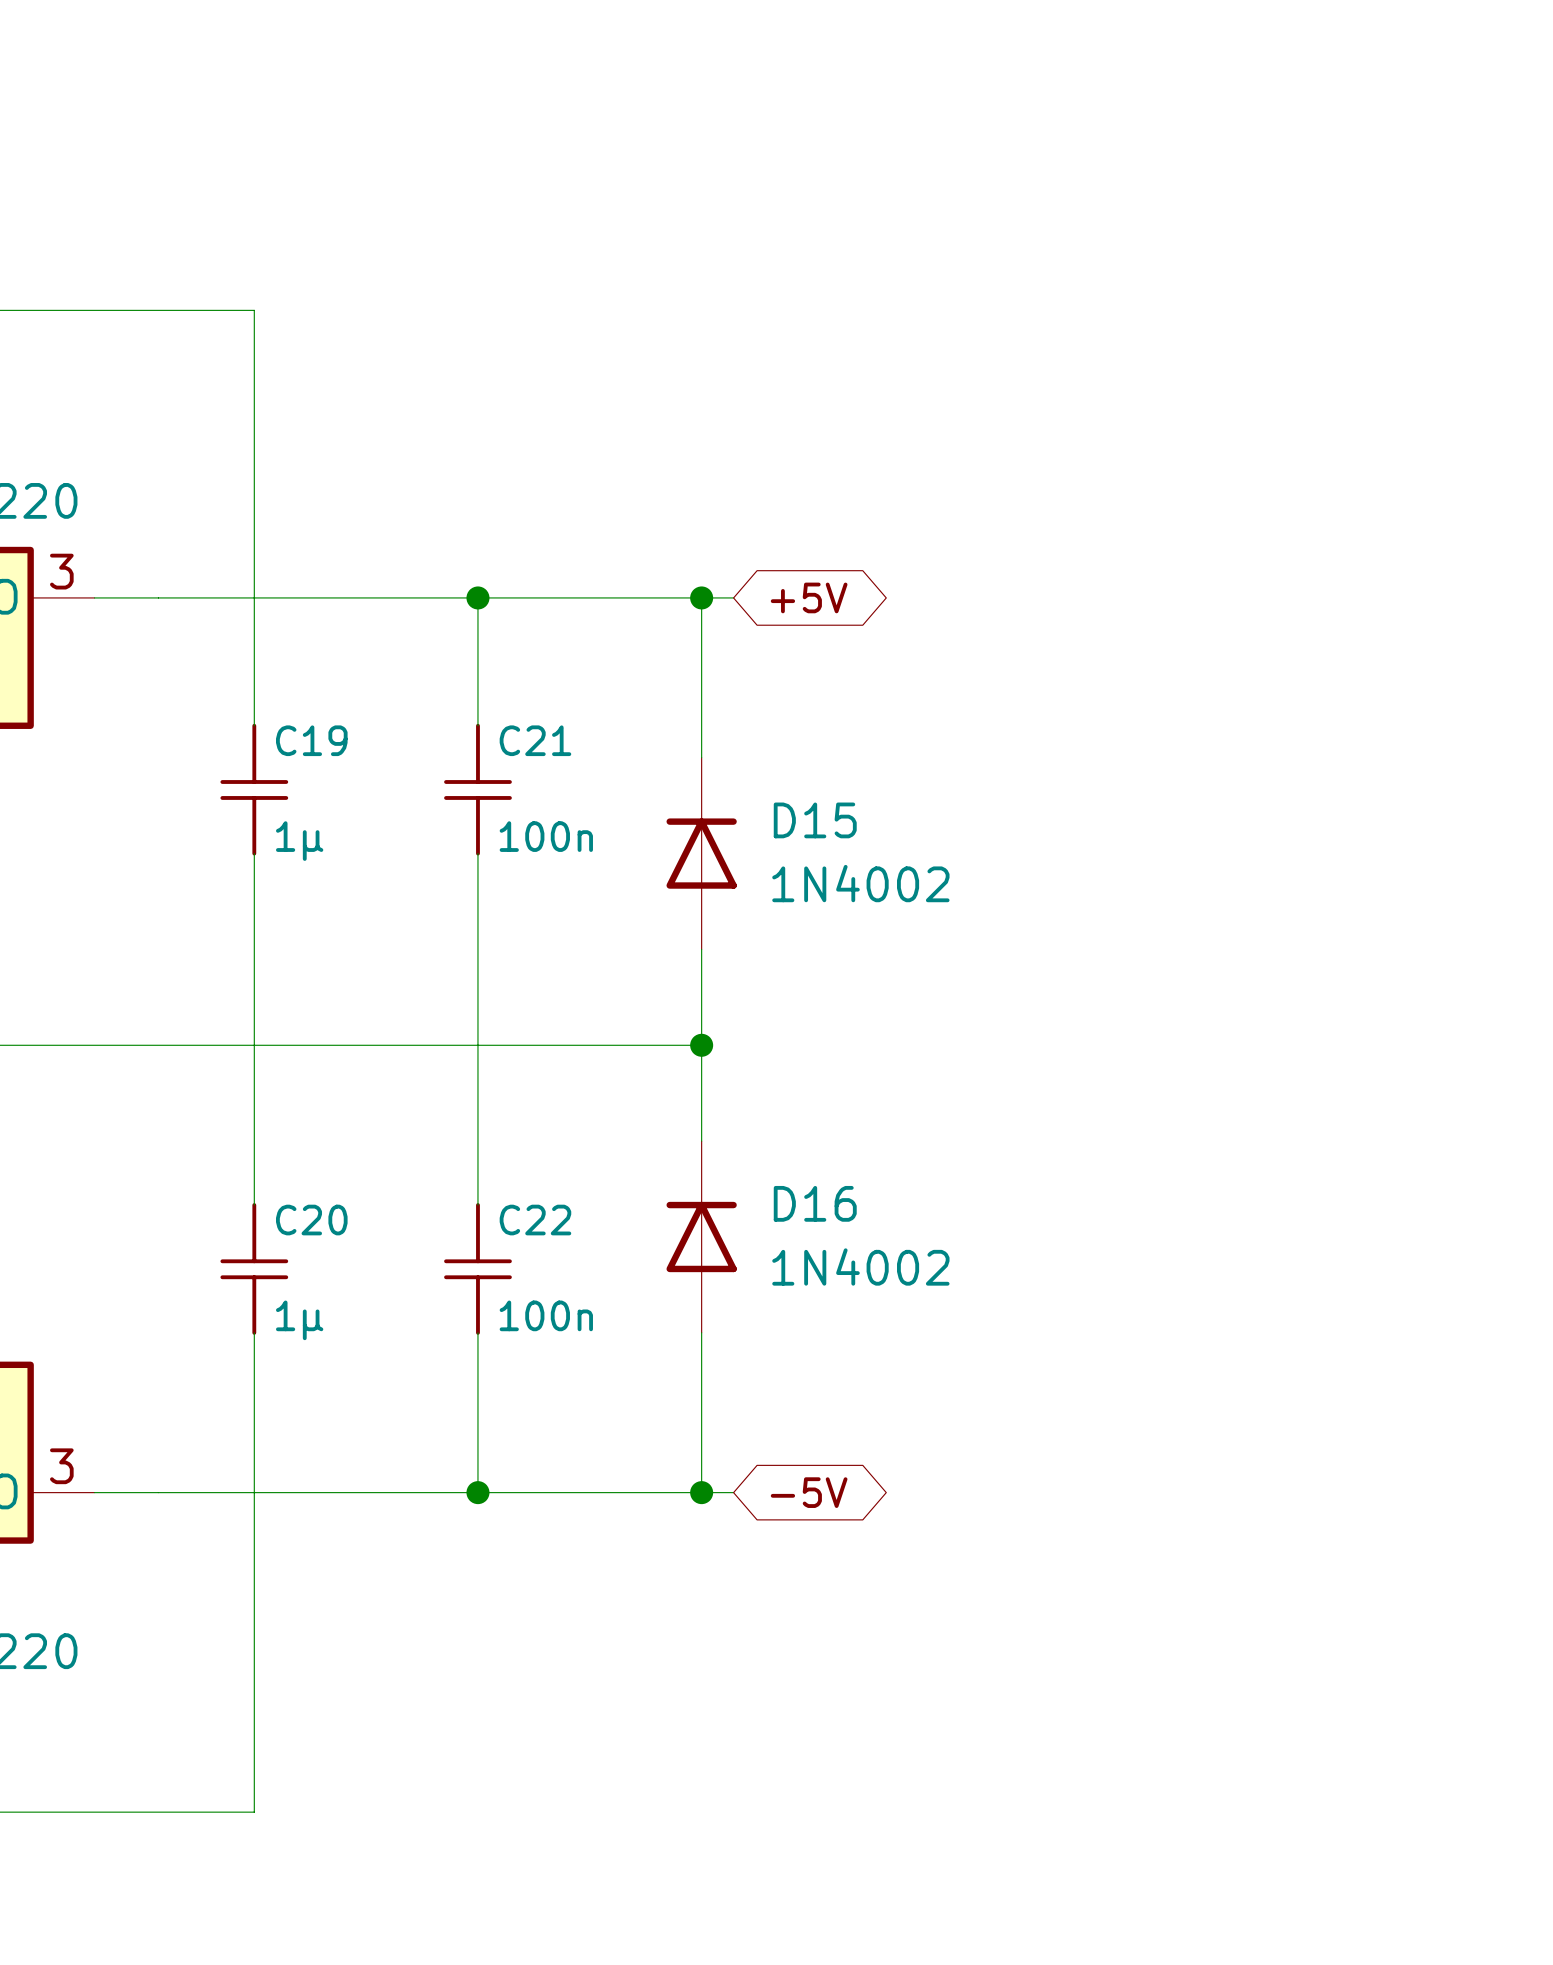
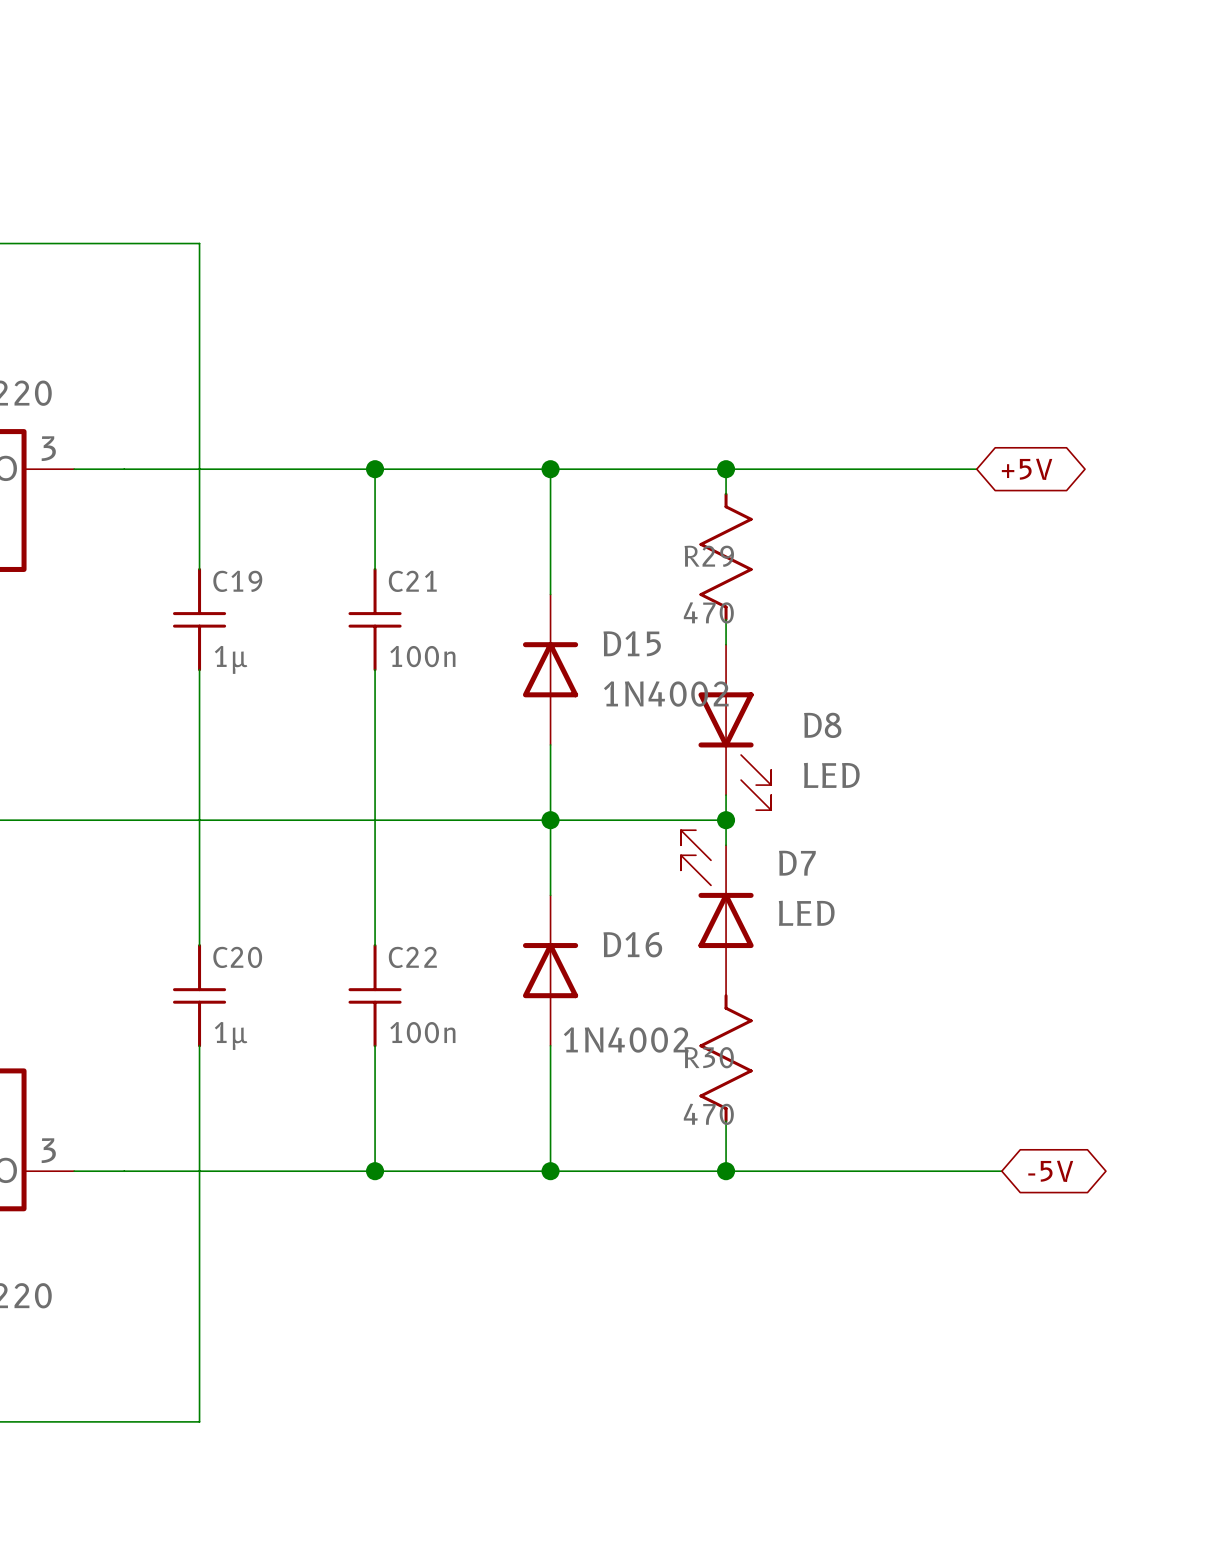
wire: none -> (575, 469) (976, 469)
global label position: +5V (809, 597) -> +5V (1027, 469)
wire: none -> (726, 469) (726, 494)
junction: none -> (726, 469)
R29: none -> 470 (726, 556)
wire: none -> (726, 619) (726, 644)
D8: none -> LED (734, 727)
wire: none -> (726, 795) (726, 845)
wire: none -> (550, 820) (726, 820)
junction: none -> (726, 820)
D7: none -> LED (717, 912)
D16 value position: 1N4002 (860, 1267) -> 1N4002 (626, 1040)
R30: none -> 470 (726, 1058)
wire: none -> (726, 1121) (726, 1171)
wire: none -> (575, 1171) (1001, 1171)
global label position: -5V (809, 1492) -> -5V (1050, 1171)
junction: none -> (726, 1171)

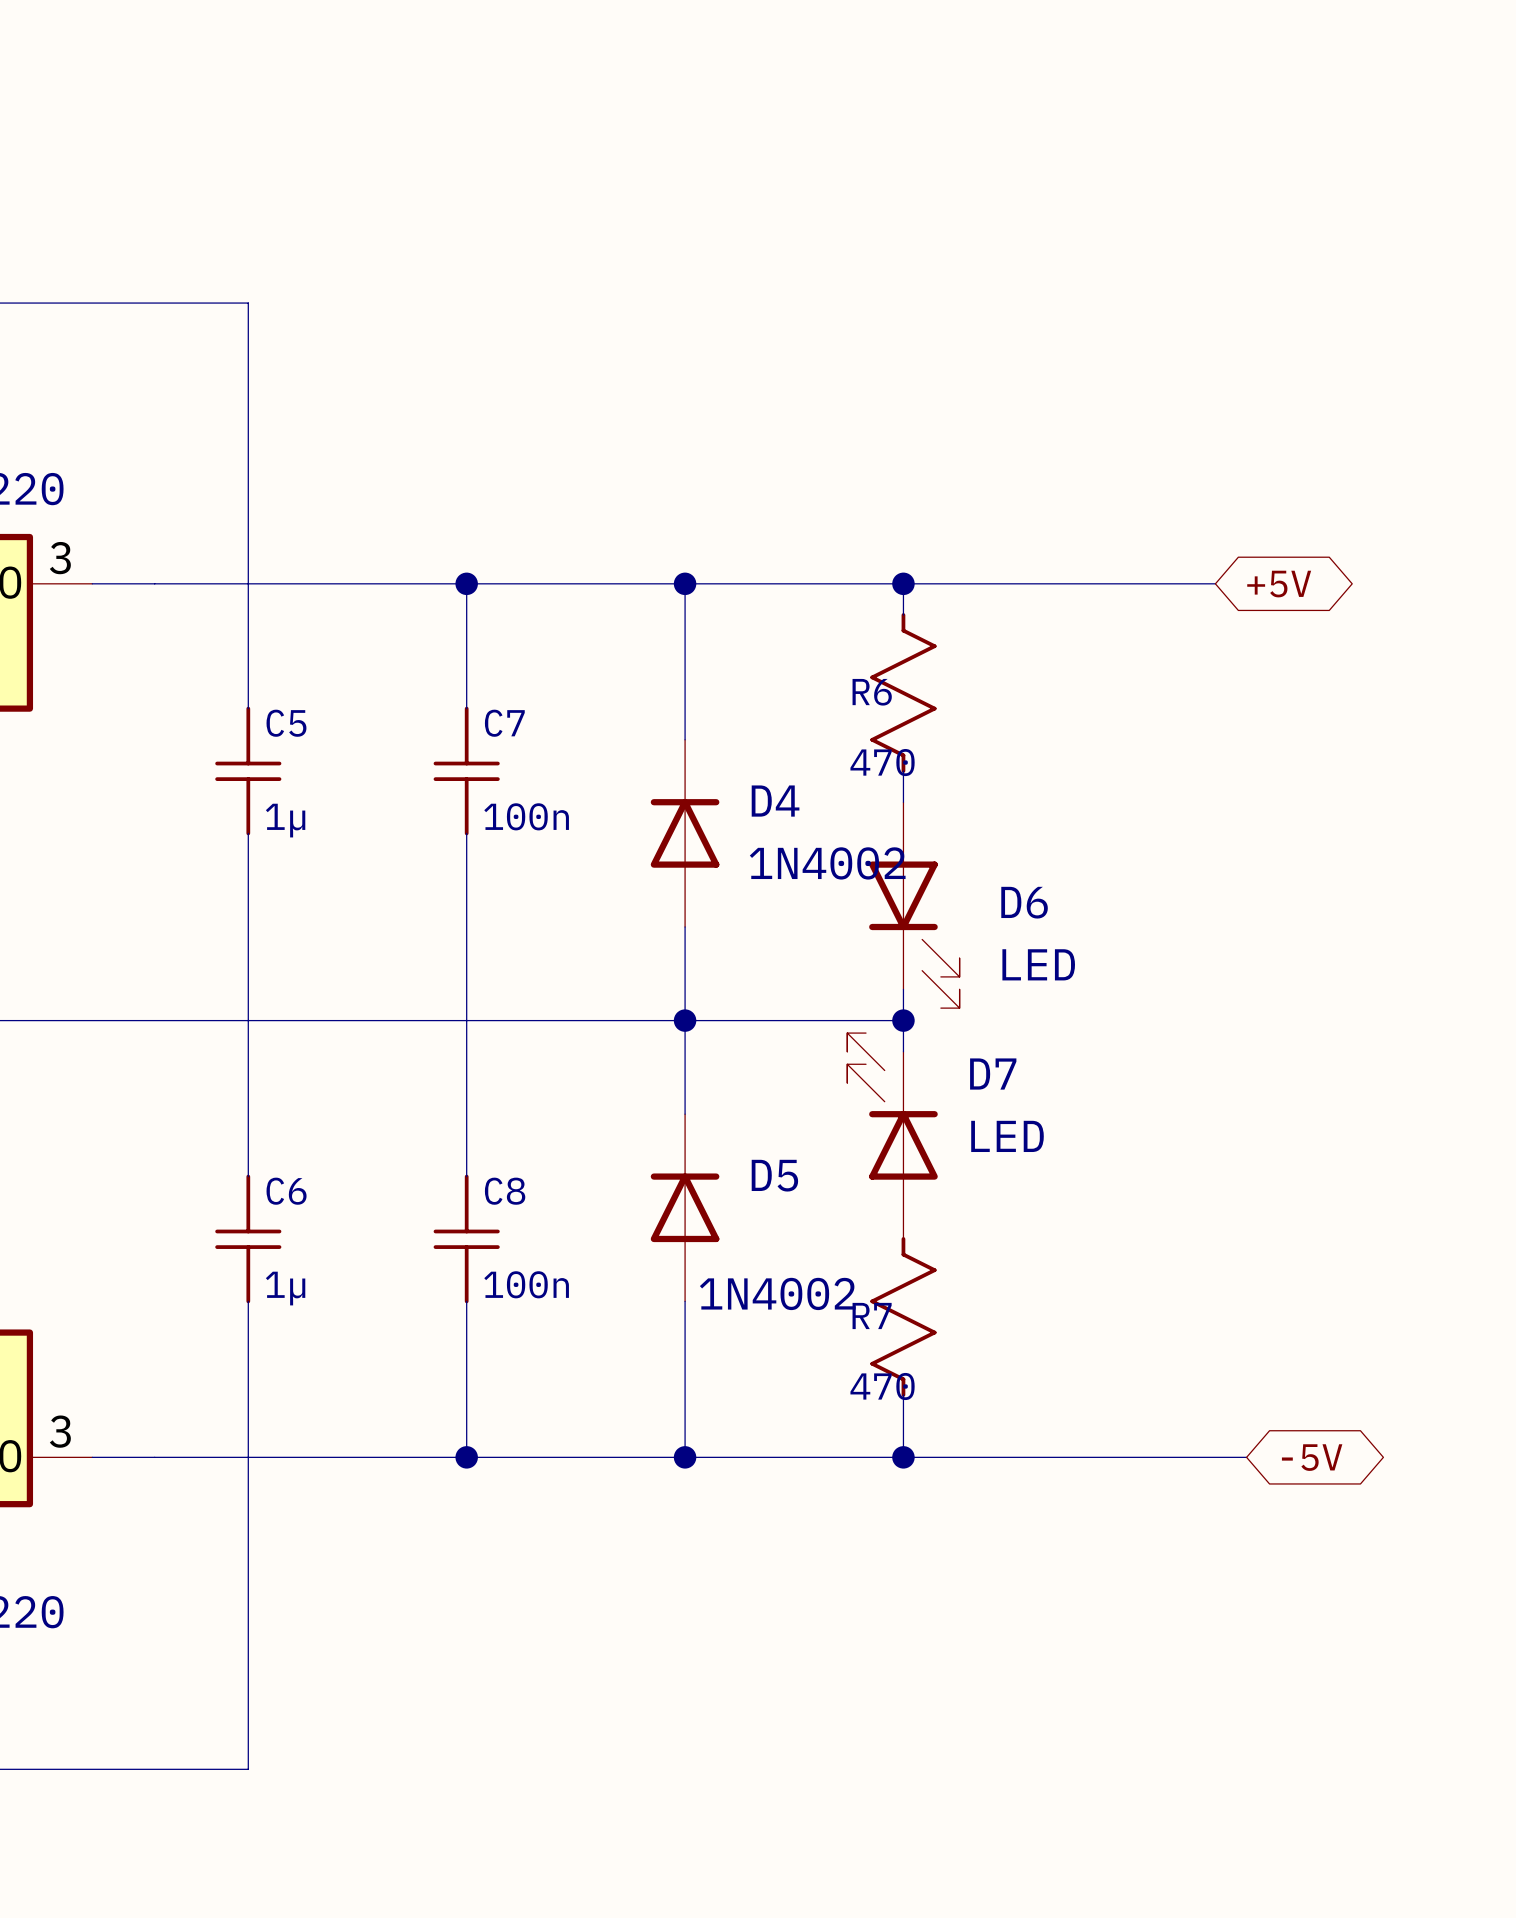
R29 name: R29 (709, 556) -> R6 (872, 692)
C19 name: C19 (237, 581) -> C5 (286, 723)
C21 name: C21 (412, 581) -> C7 (504, 723)
D15 name: D15 (632, 643) -> D4 (775, 801)
D8 name: D8 (822, 725) -> D6 (1024, 902)
D16 name: D16 (632, 944) -> D5 (774, 1175)
C20 name: C20 (237, 957) -> C6 (286, 1191)
C22 name: C22 (412, 957) -> C8 (505, 1191)
R30 name: R30 (709, 1057) -> R7 (872, 1315)

